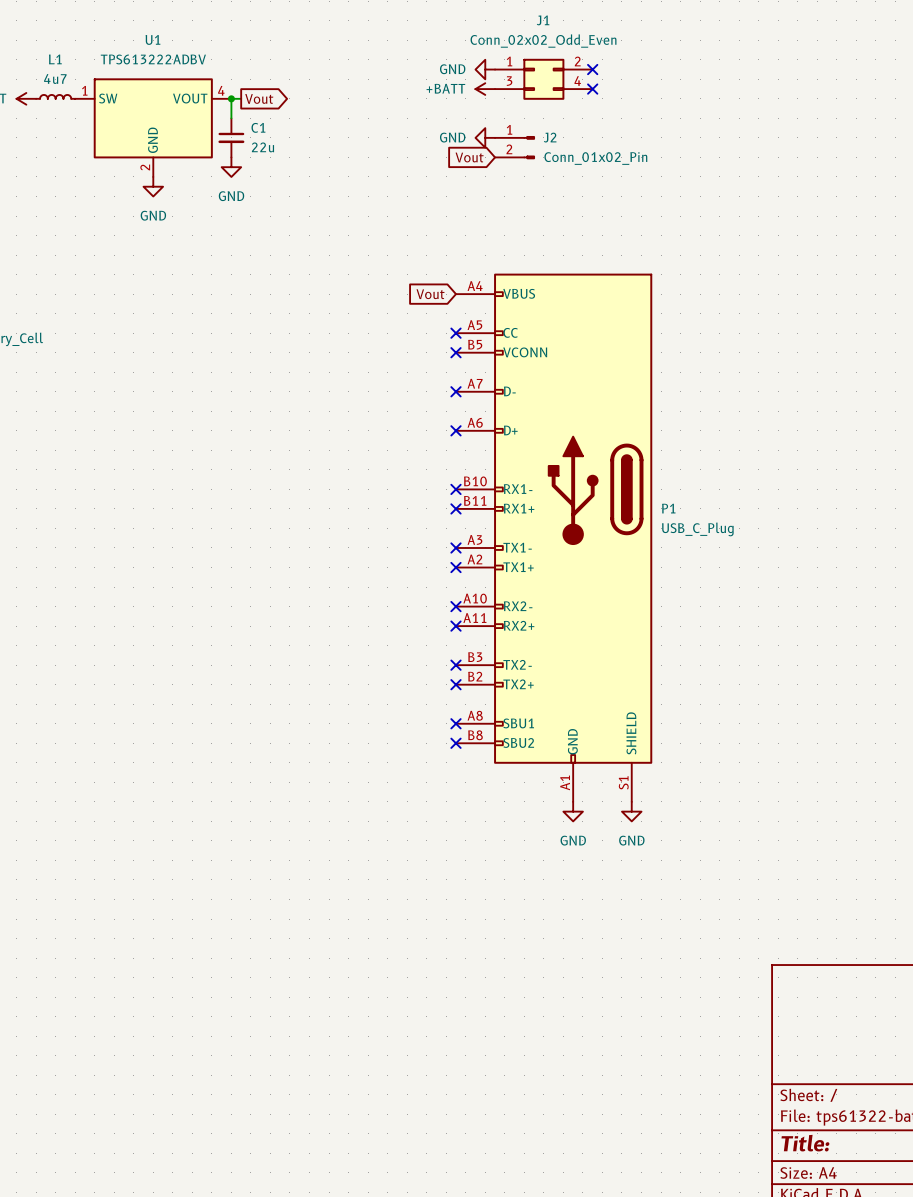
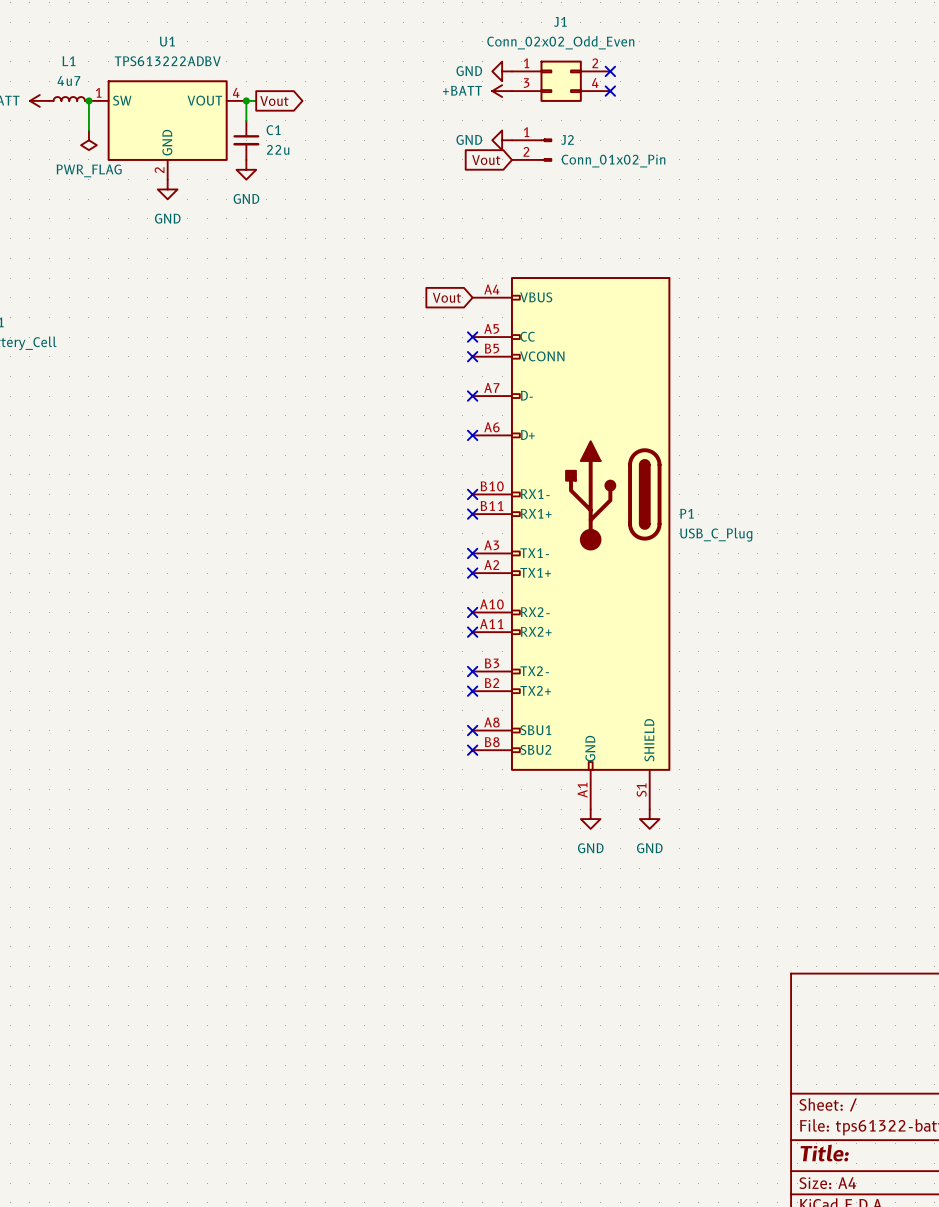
wire: none -> (88, 100) (88, 130)
junction: none -> (88, 100)
power symbol: none -> PWR_FLAG (88, 140)

